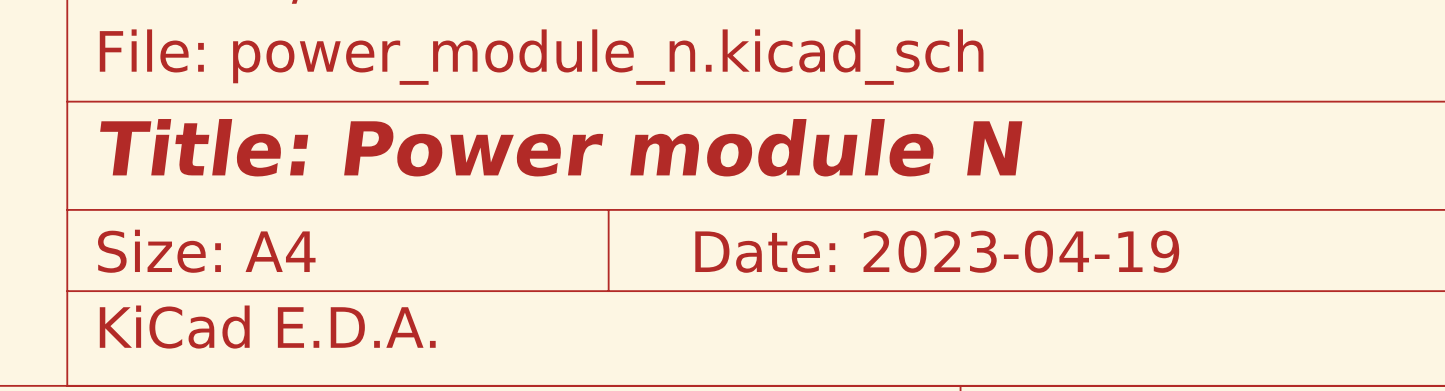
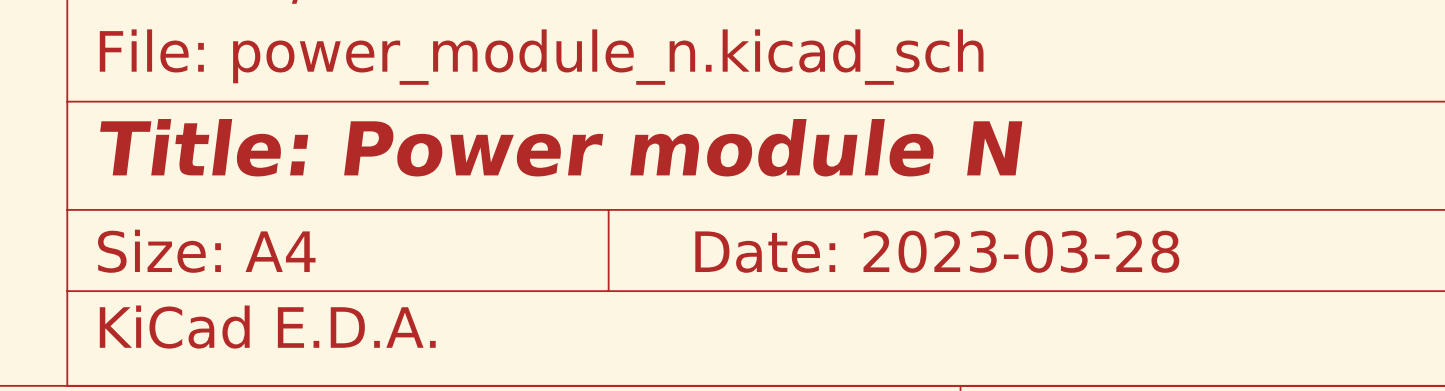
title block: Date: 2023-04-19 (937, 251) -> Date: 2023-03-28 (937, 251)

